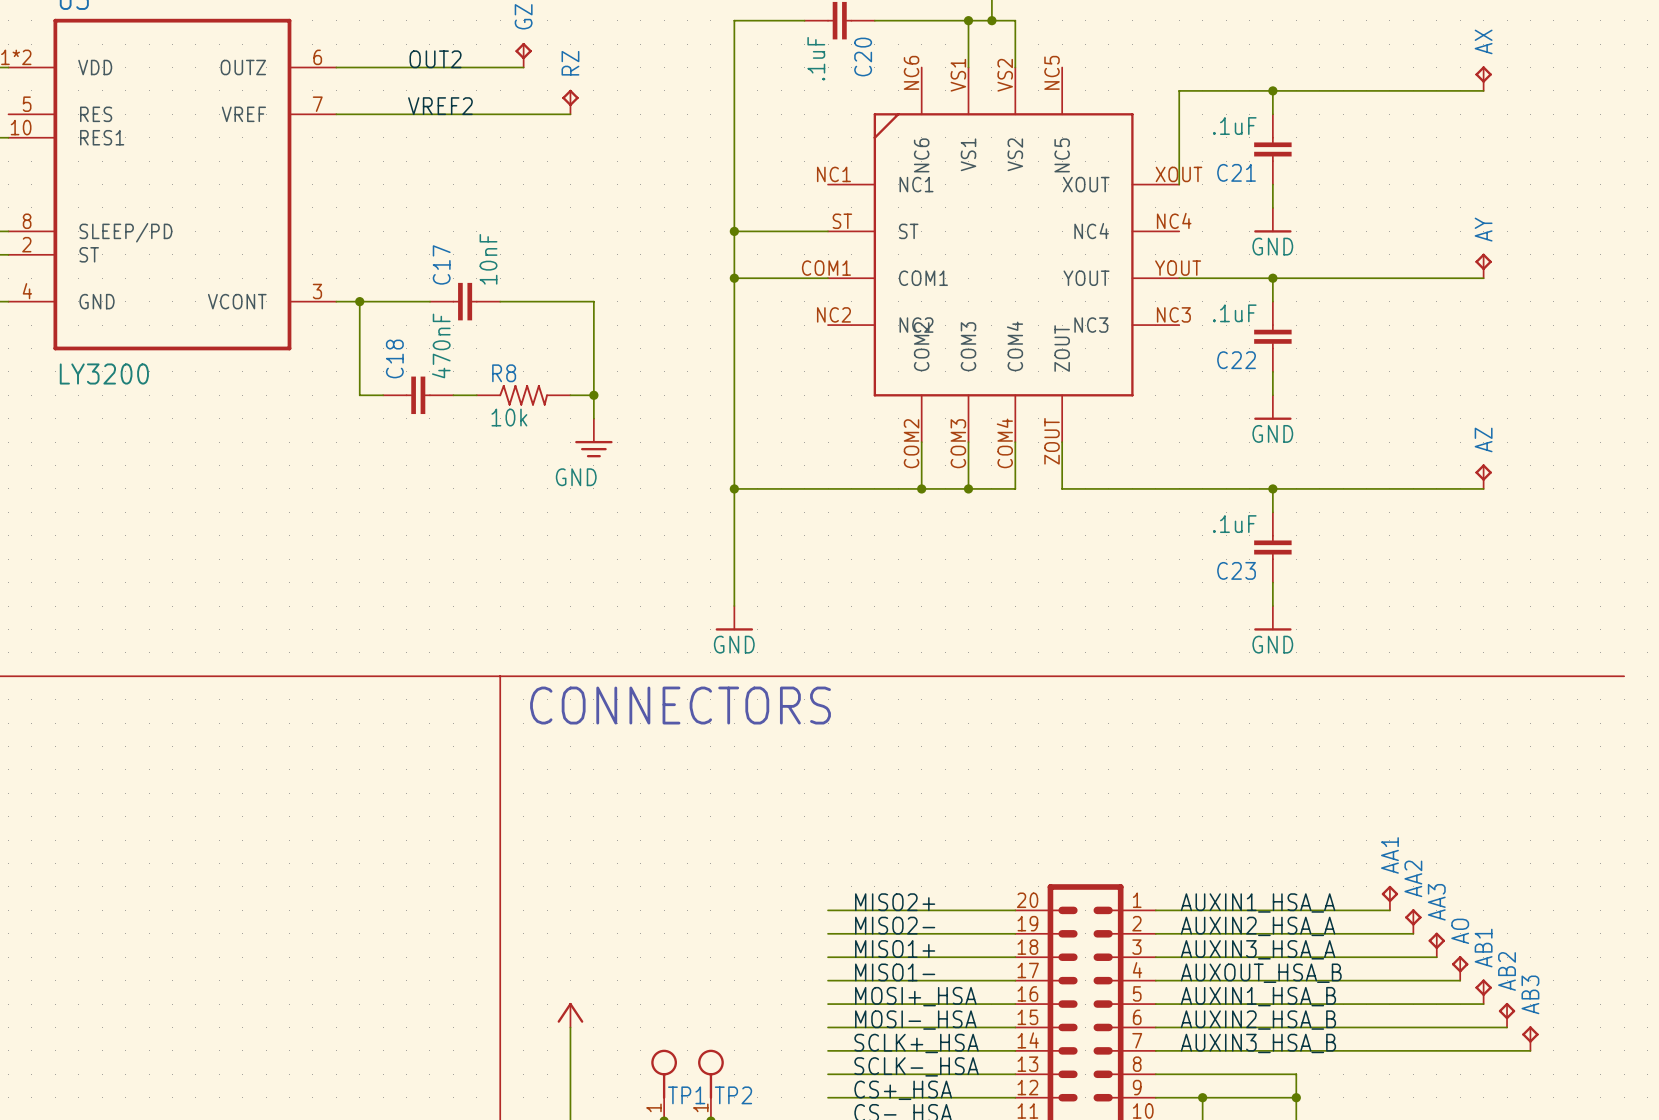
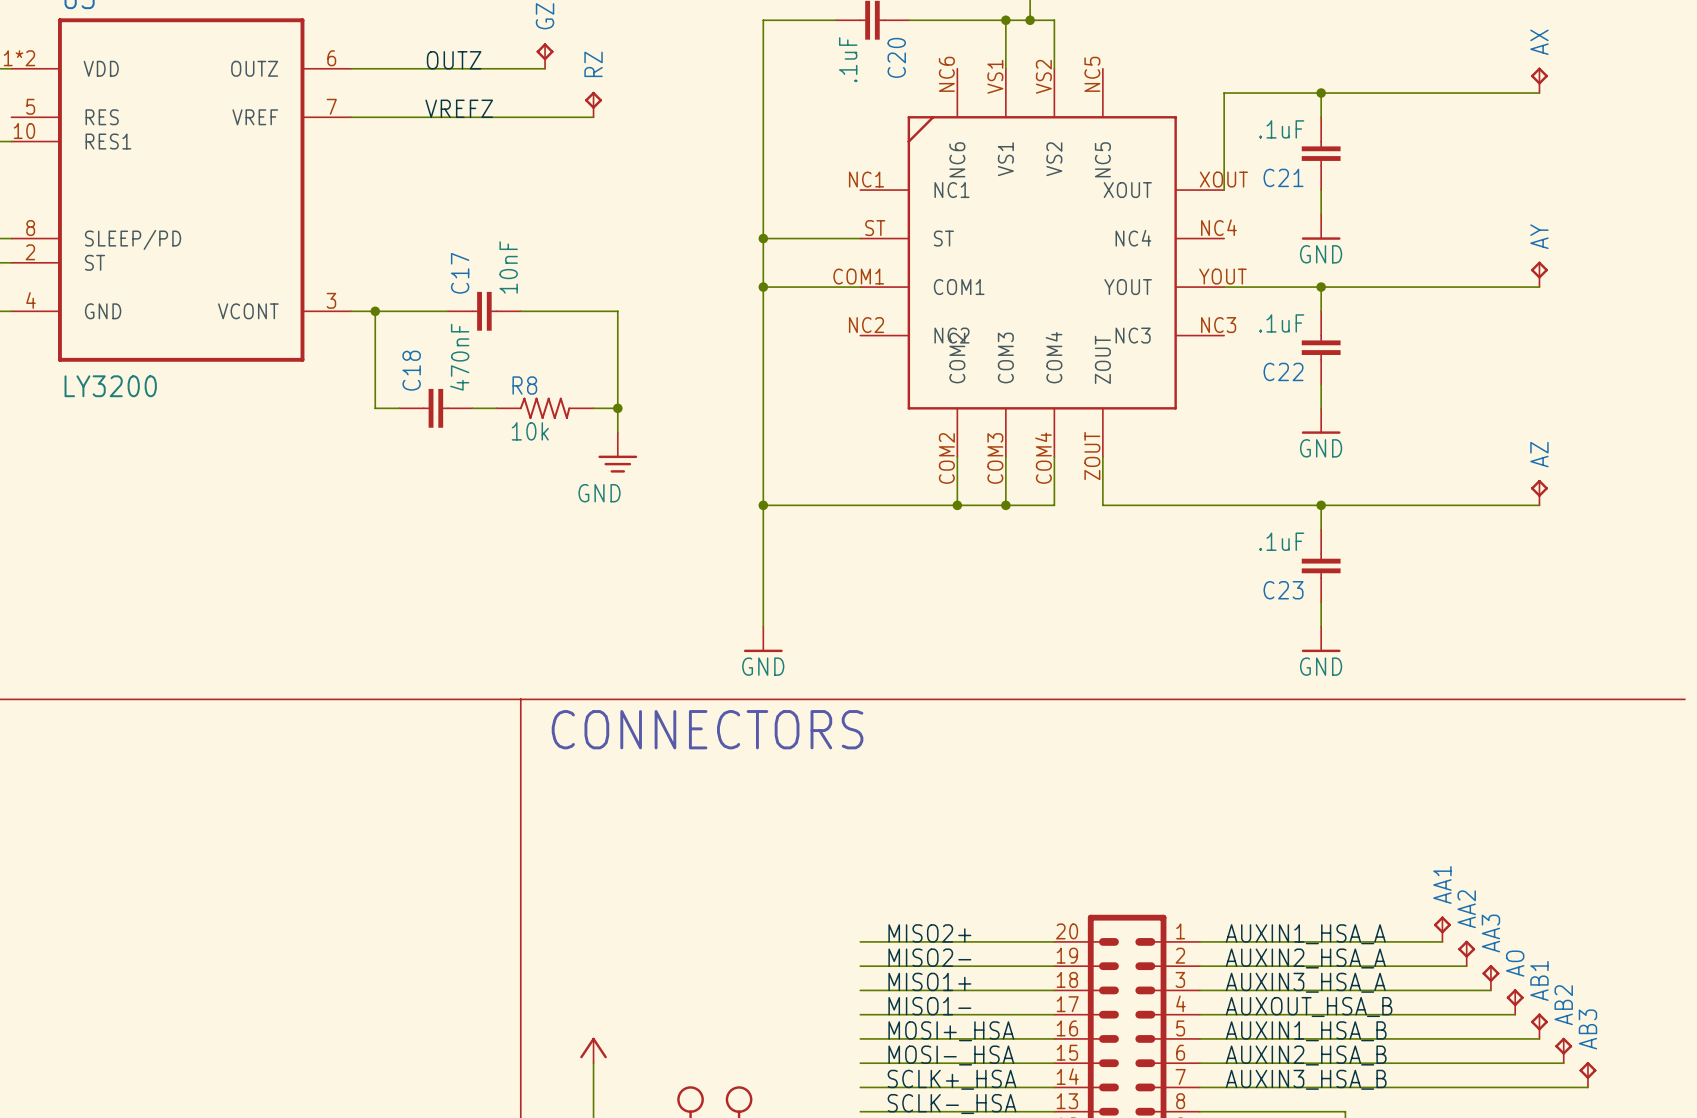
label: OUT2 (435, 59) -> OUTZ (454, 60)
label: VREF2 (440, 106) -> VREFZ (459, 108)

